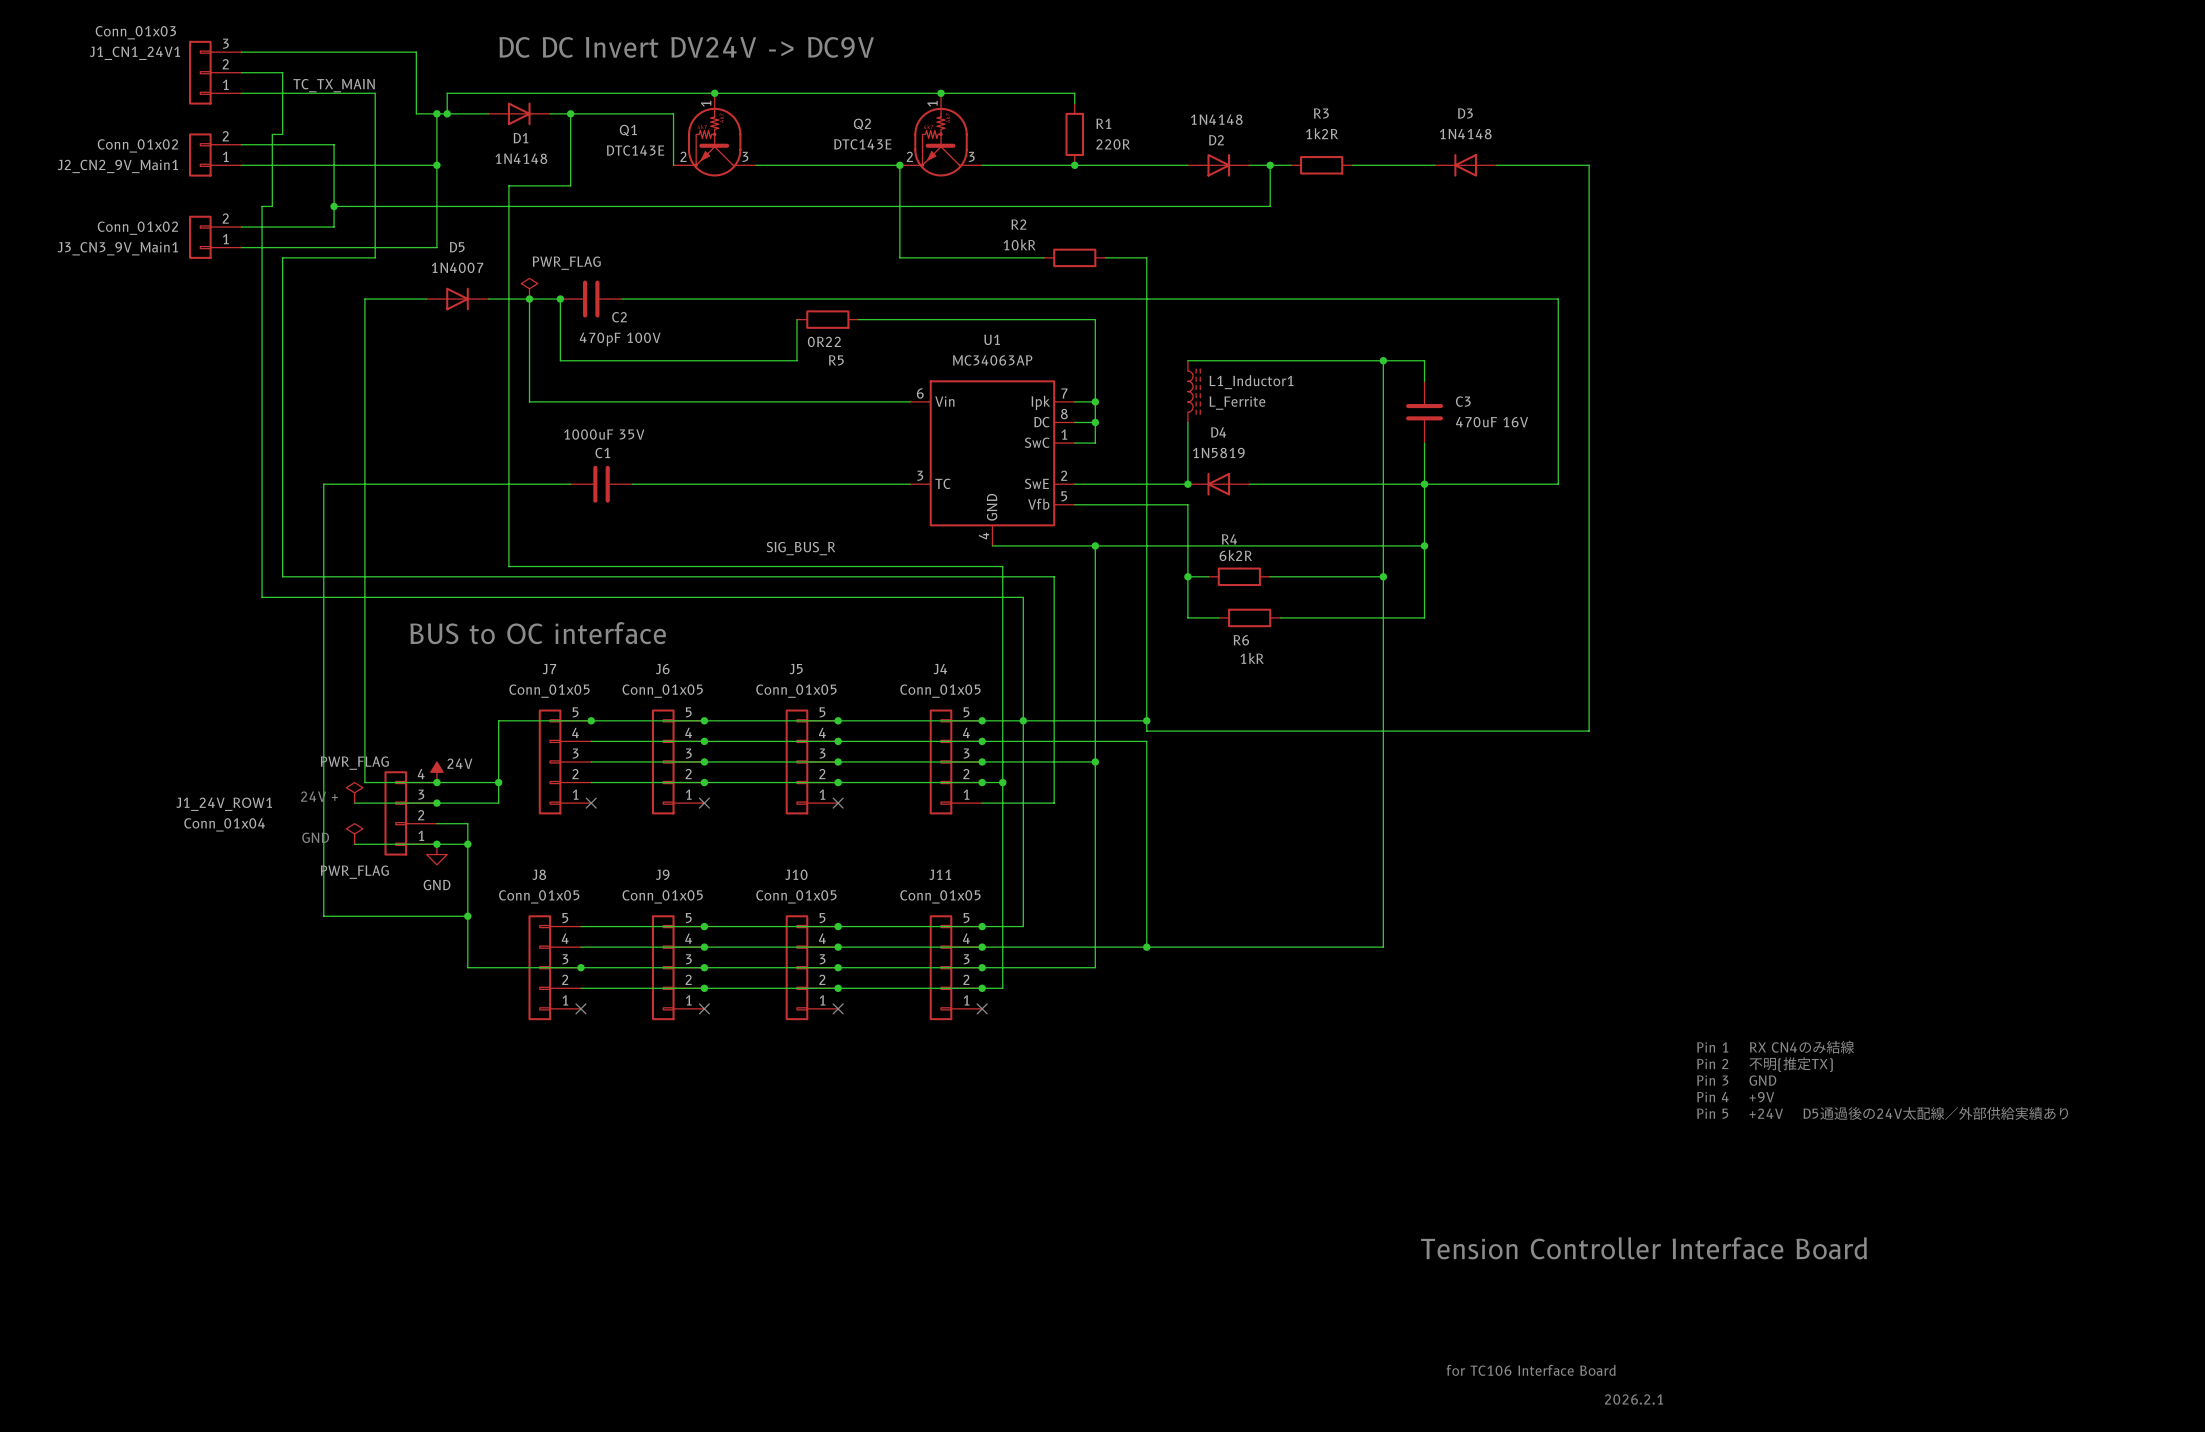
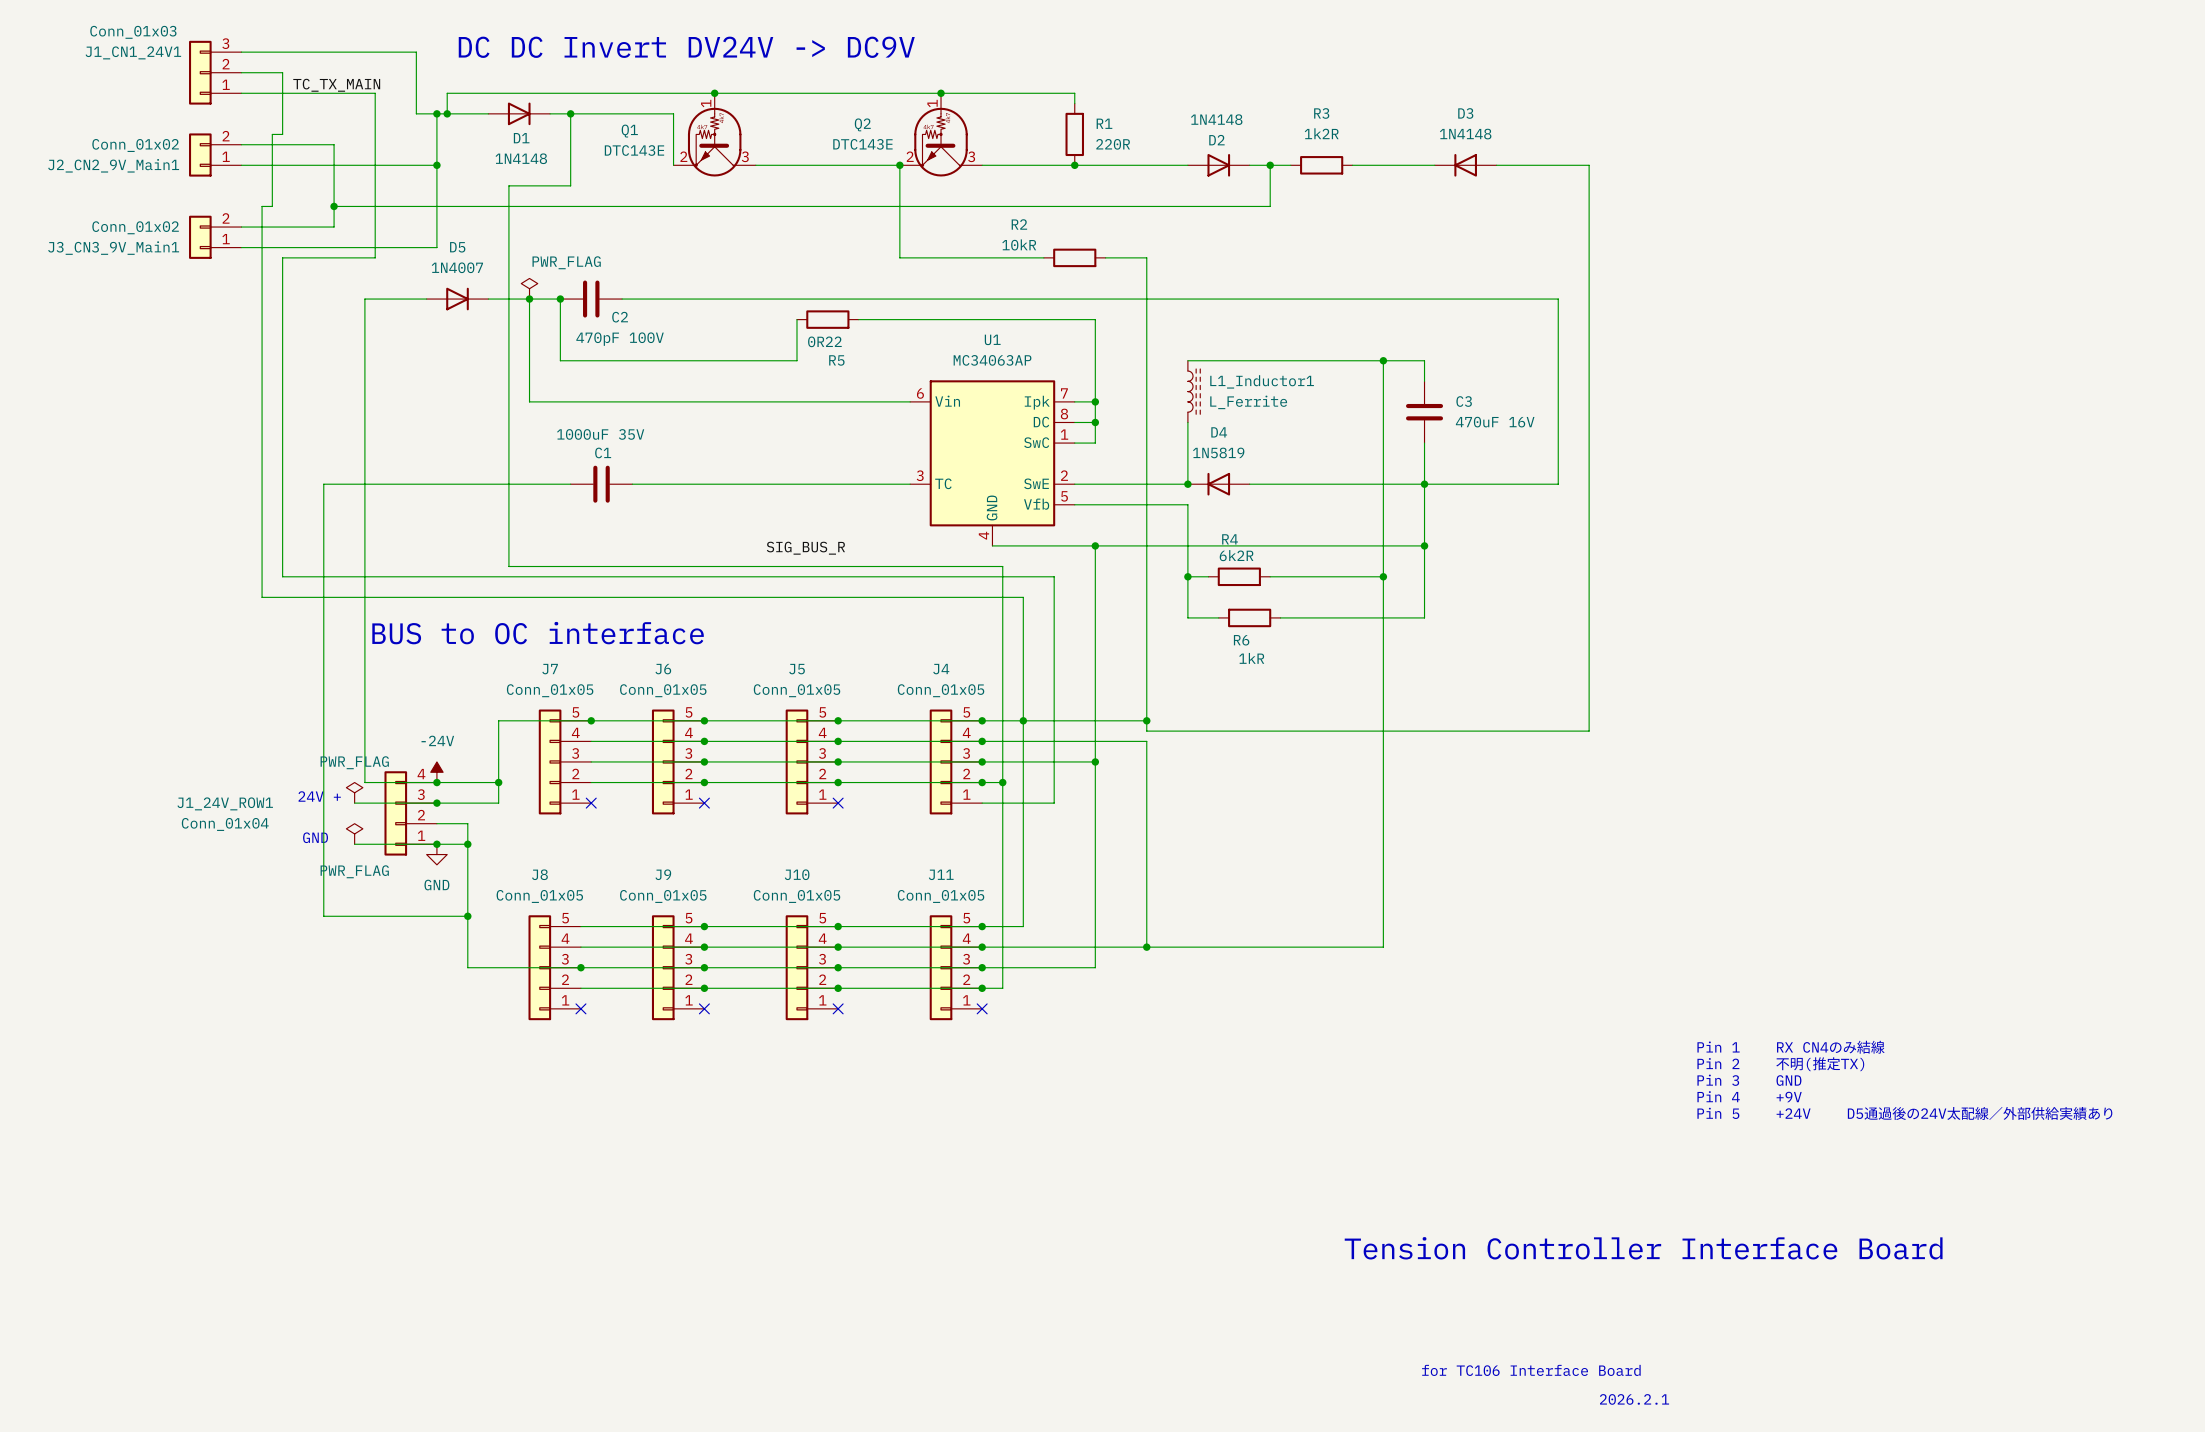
power symbol: 24V (436, 772) -> -24V (436, 772)

